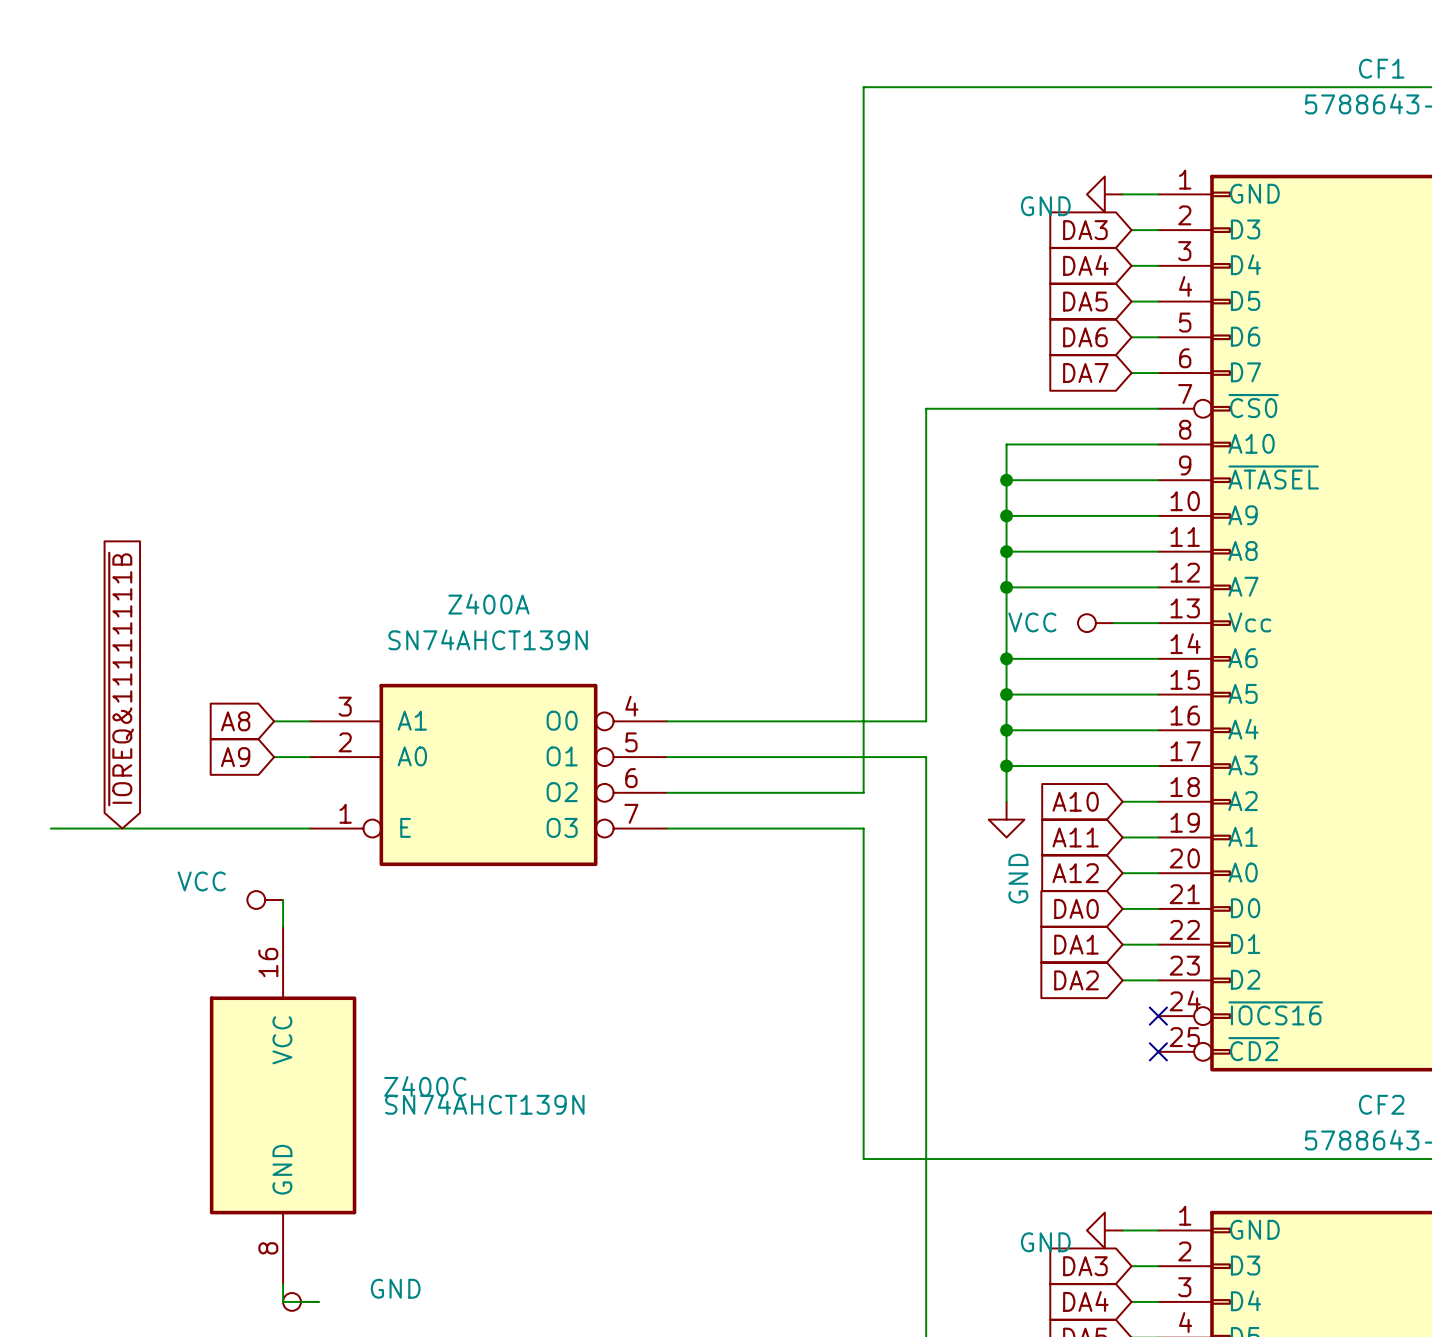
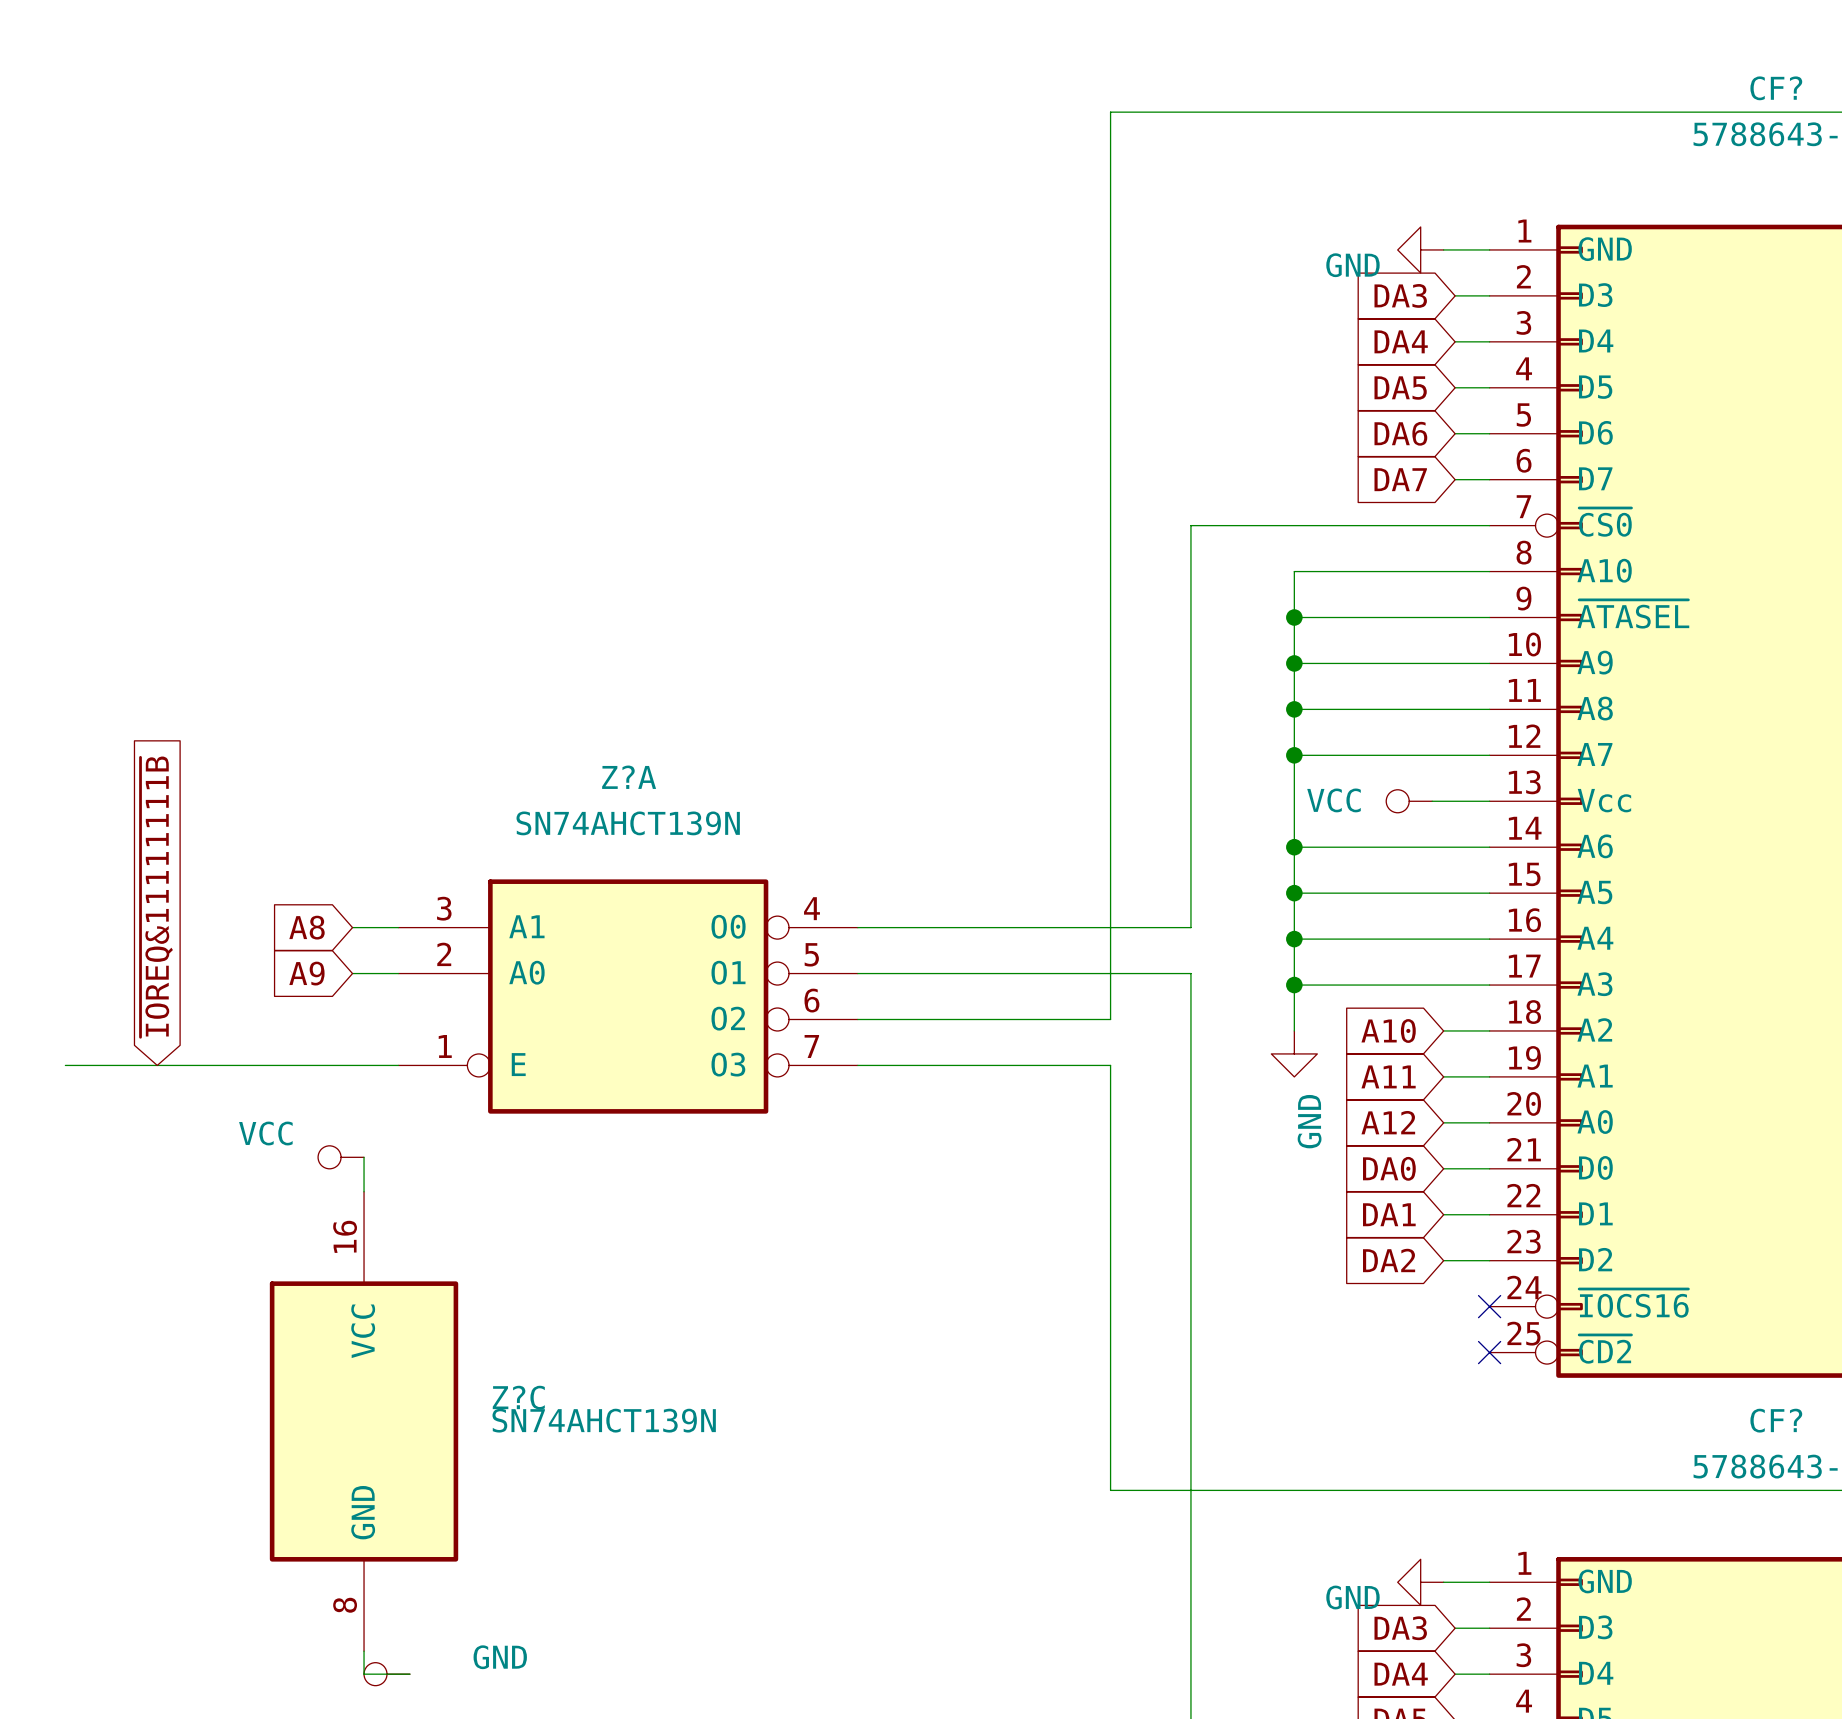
CF1 name: CF1 (1381, 68) -> CF? (1776, 88)
Z400A name: Z400A (488, 604) -> Z?A (629, 777)
Z400C name: Z400C (425, 1086) -> Z?C (518, 1397)
CF2 name: CF2 (1381, 1104) -> CF? (1776, 1420)

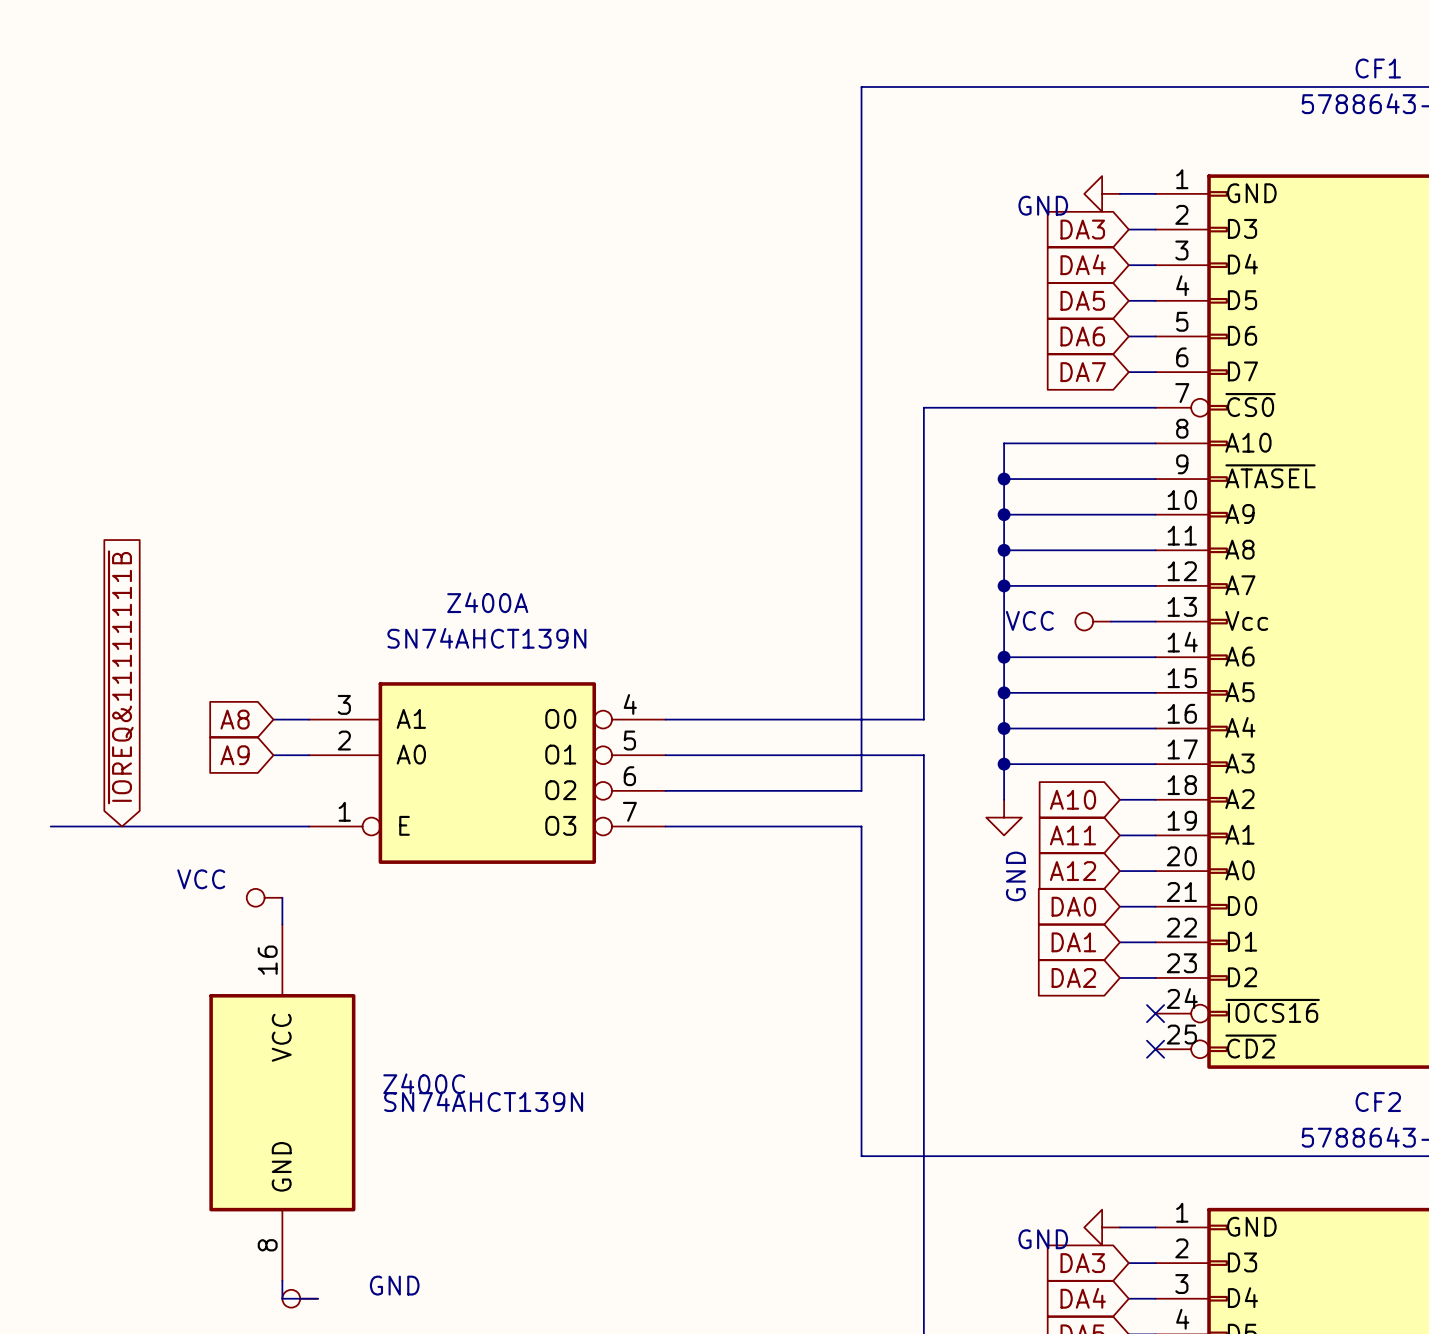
CF? name: CF? (1776, 88) -> CF1 (1378, 68)
Z?A name: Z?A (629, 777) -> Z400A (487, 602)
Z?C name: Z?C (518, 1397) -> Z400C (424, 1083)
CF? name: CF? (1776, 1420) -> CF2 (1378, 1102)

